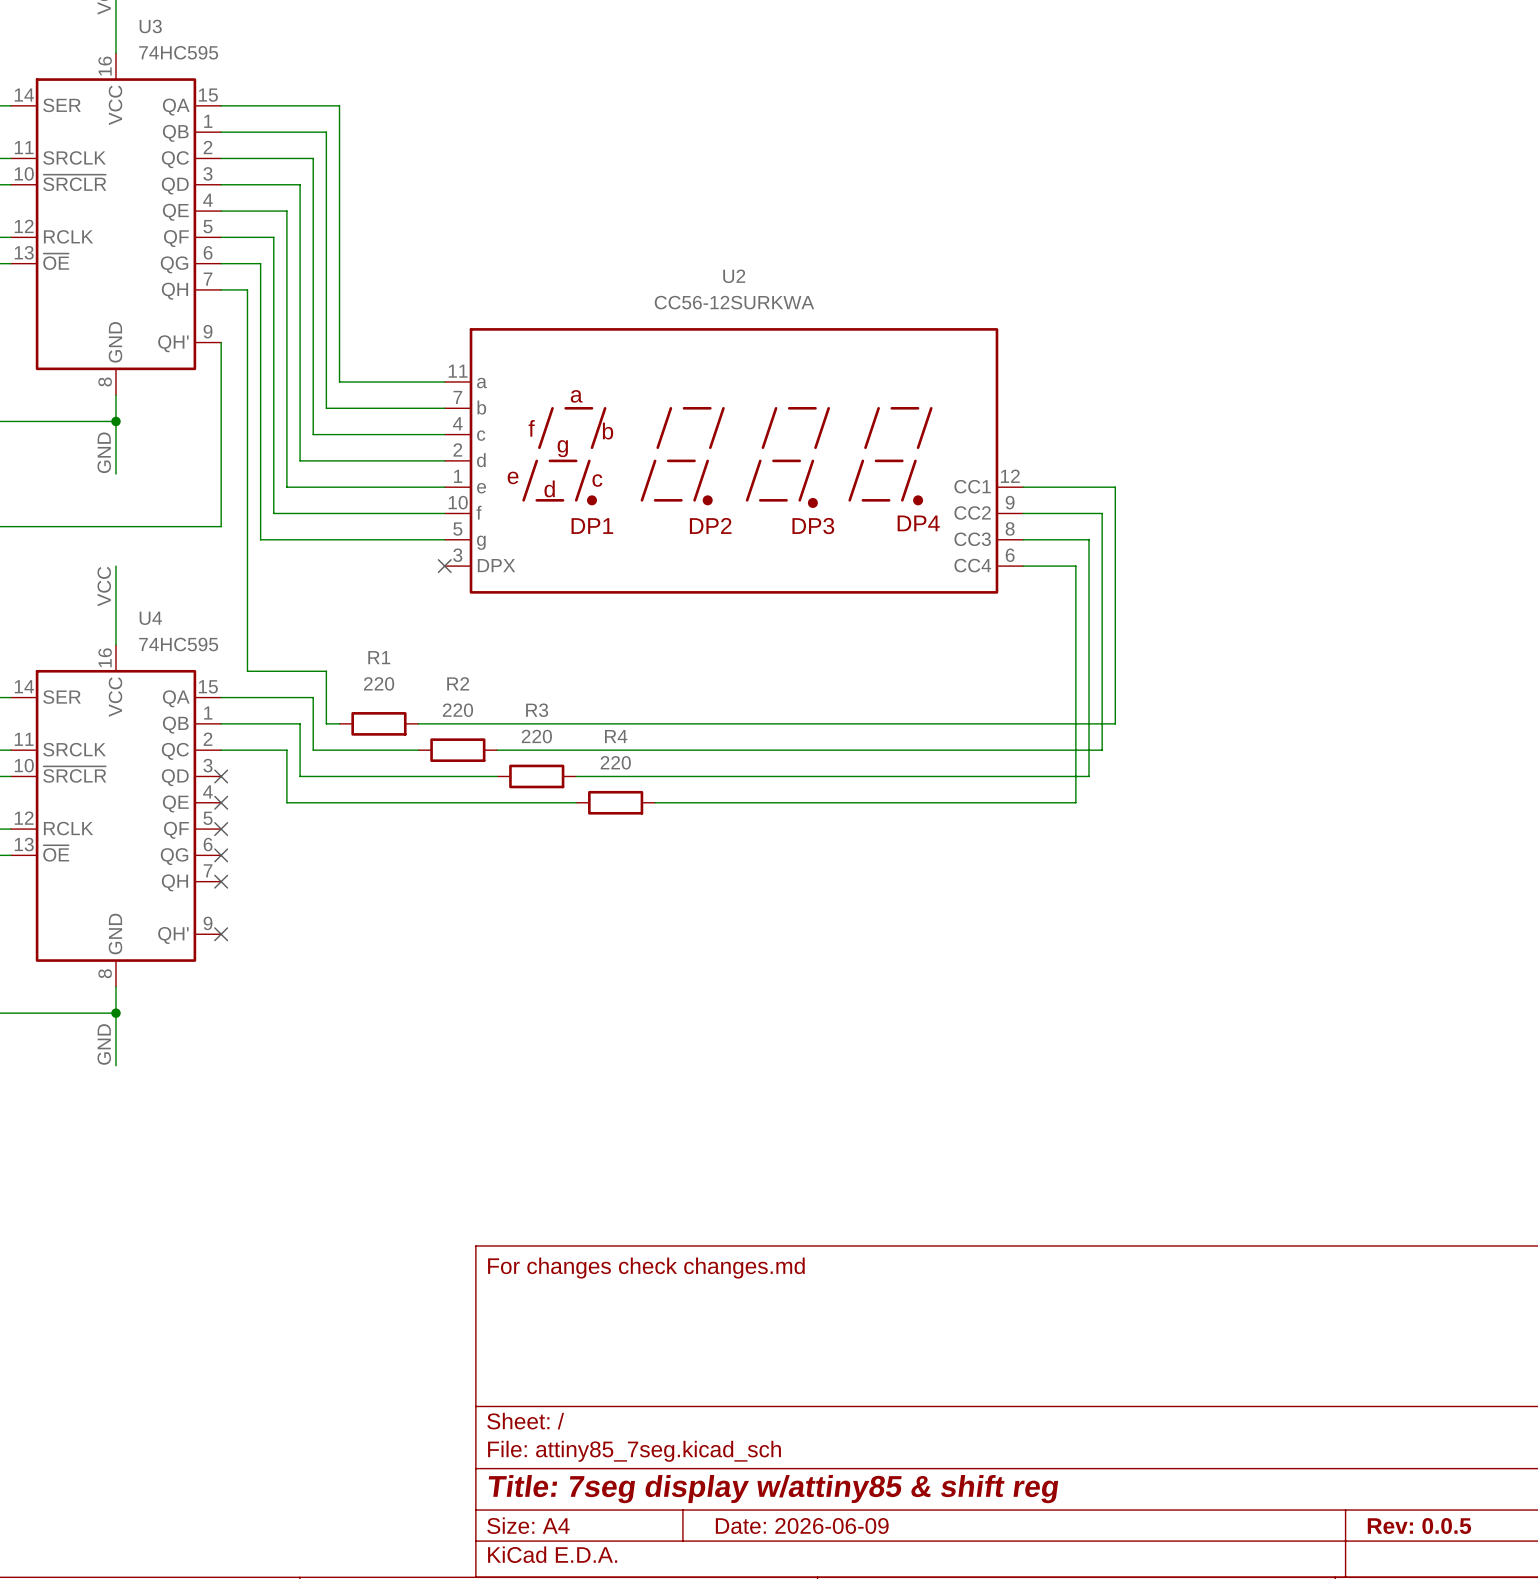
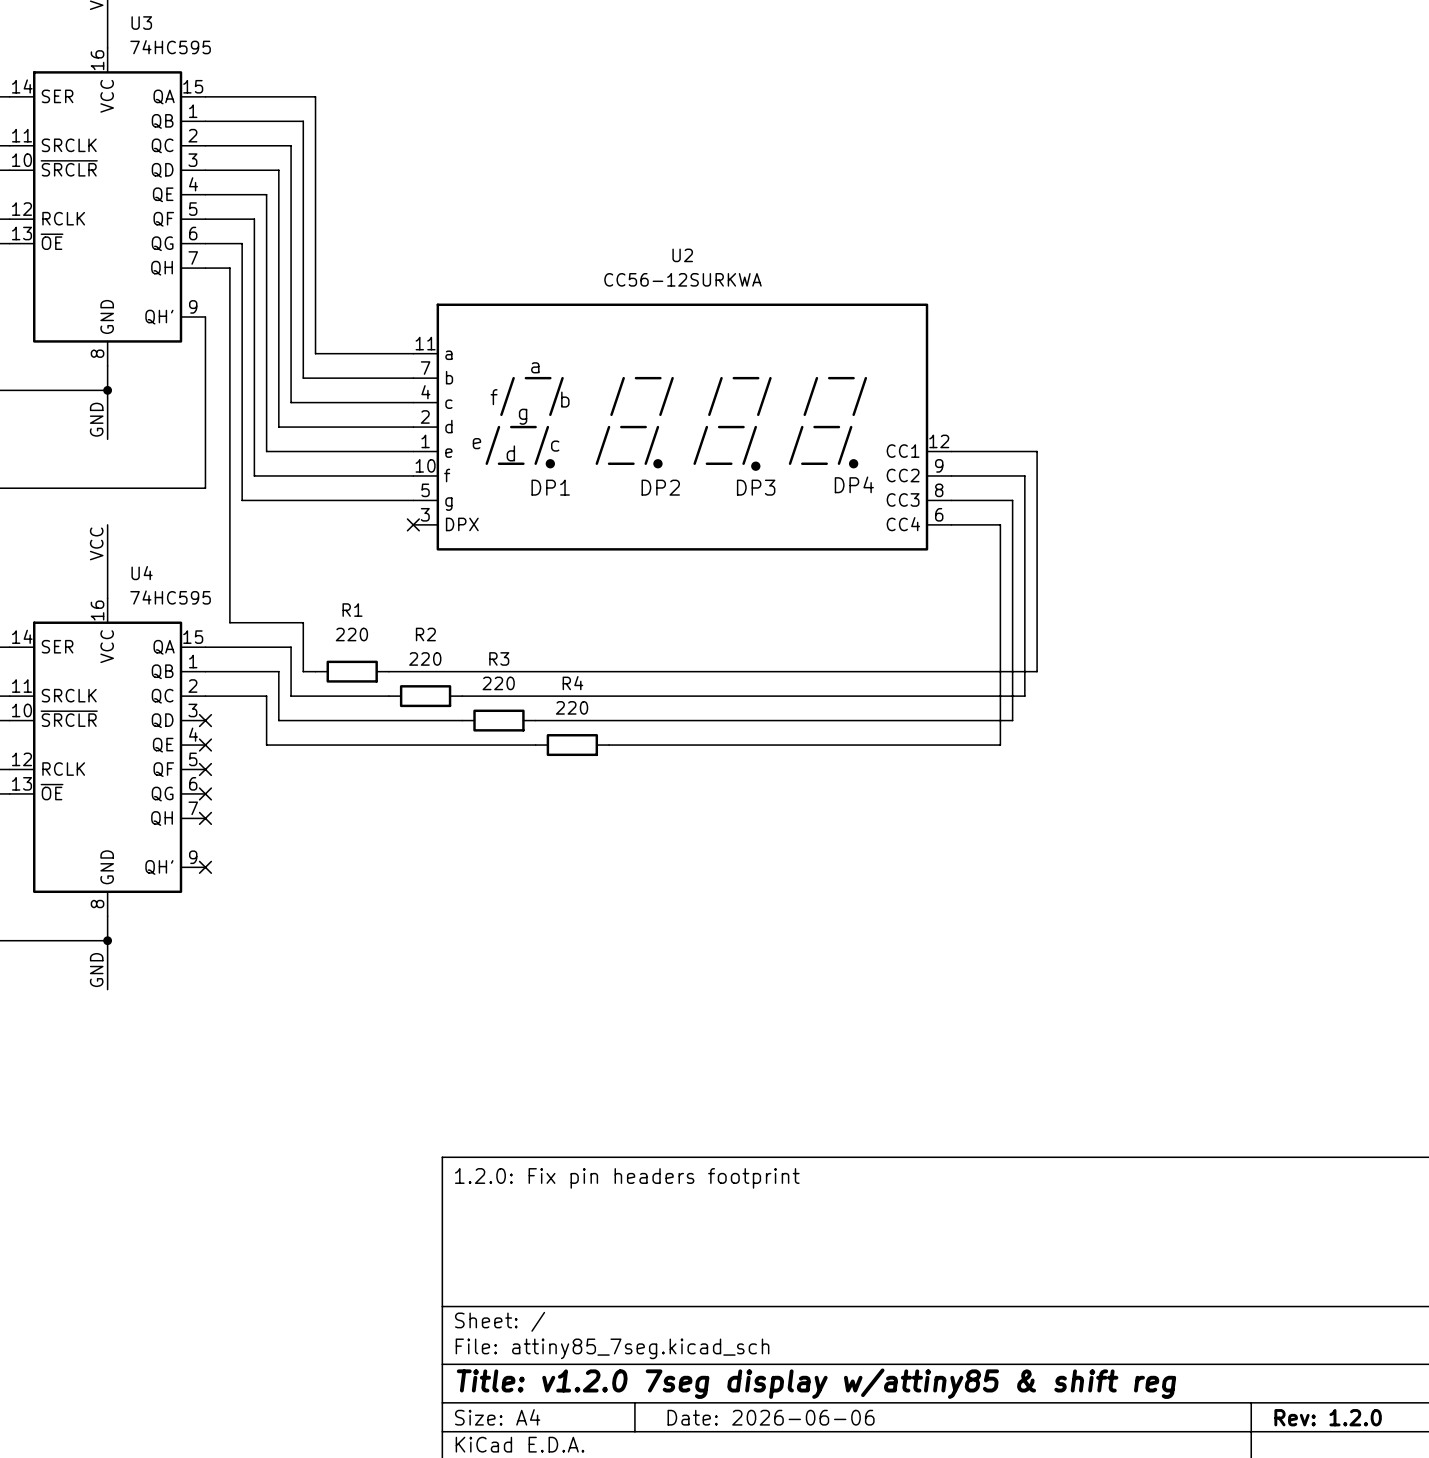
title block: For changes check changes.md (646, 1268) -> 1.2.0: Fix pin headers footprint (627, 1178)
title block: Title: 7seg display w/attiny85 & shift reg (773, 1489) -> Title: v1.2.0 7seg display w/attiny85 & shift reg (816, 1383)
title block: Date: 2026-06-09 (802, 1526) -> Date: 2026-06-06 (771, 1417)
title block: Rev: 0.0.5 (1419, 1526) -> Rev: 1.2.0 (1328, 1417)

